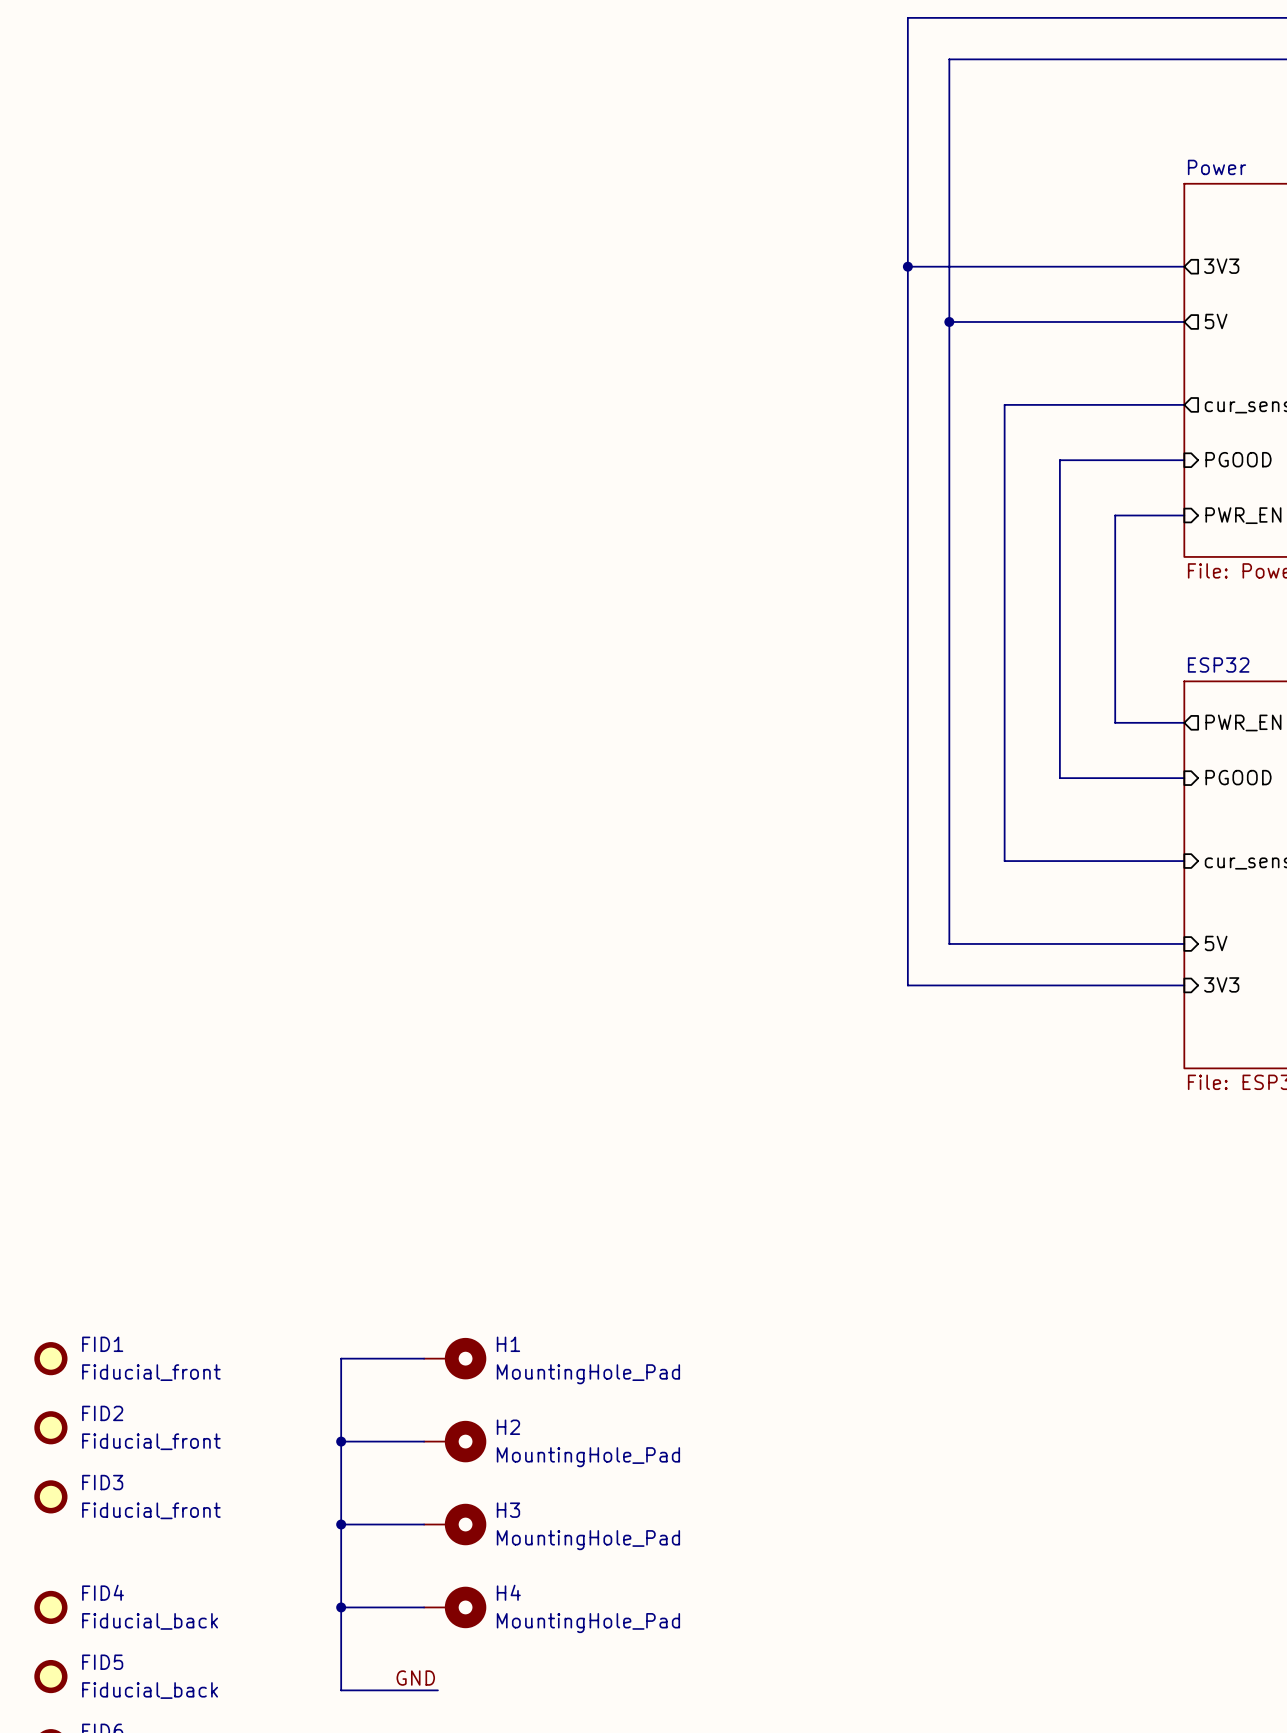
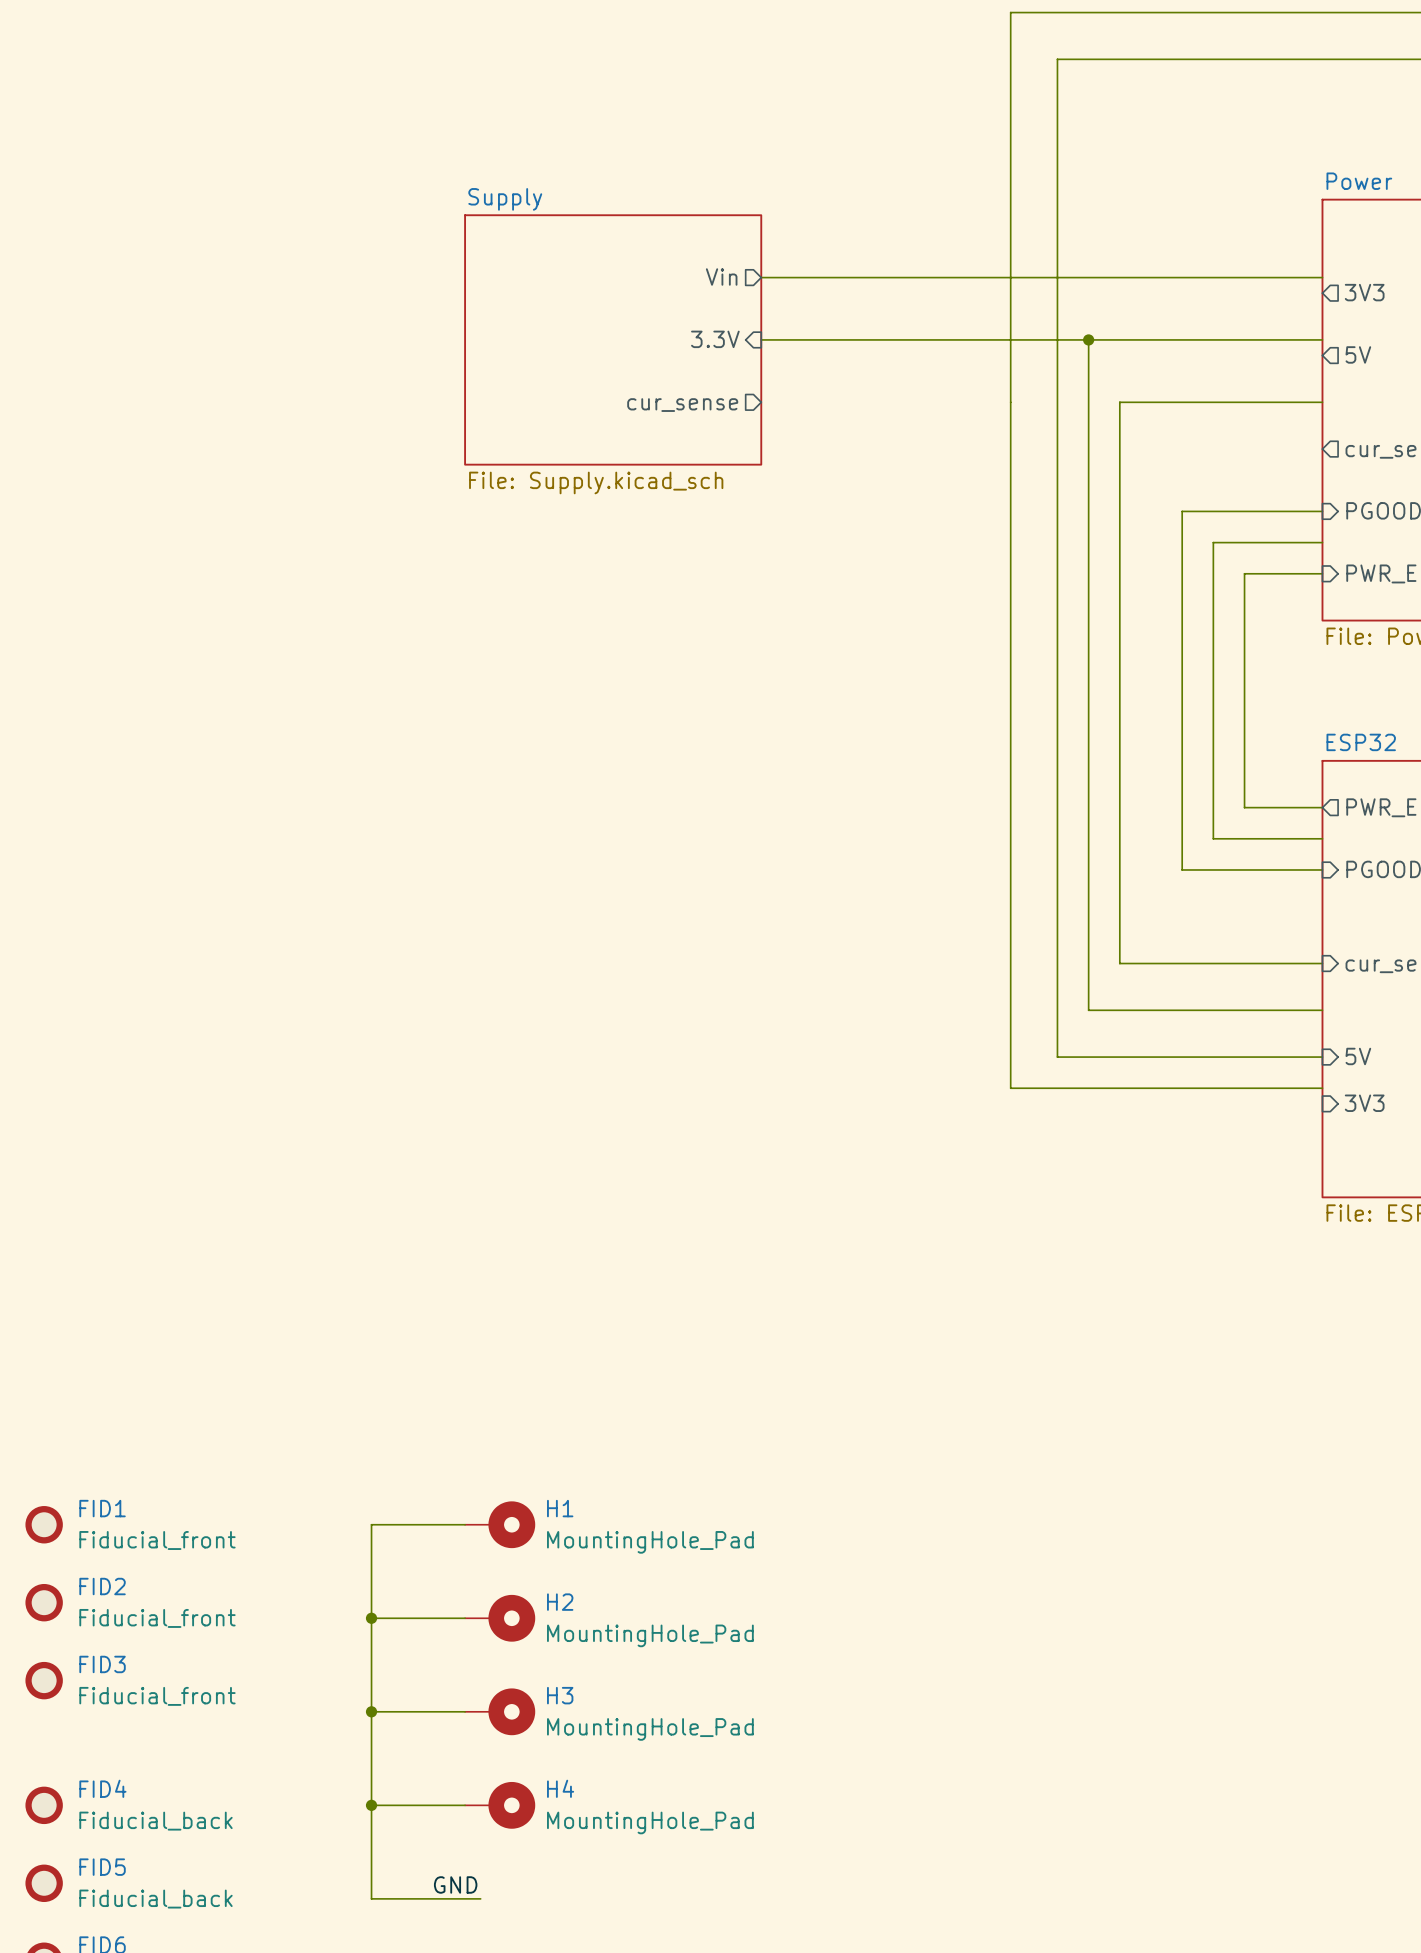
sheet pin: none -> Vin (721, 277)
wire: none -> (761, 277) (1322, 277)
wire: (907, 266) (1184, 266) -> none
junction: (907, 266) -> none
sheet pin: none -> 3.3V (715, 339)
sheet Supply: none -> File: Supply.kicad_sch (613, 339)
wire: none -> (761, 339) (1322, 339)
wire: none -> (1088, 339) (1088, 1010) (1322, 1010)
wire: (949, 321) (1184, 321) -> none
junction position: (949, 321) -> (1088, 339)
sheet pin: none -> cur_sense (682, 405)
wire: (1004, 404) (1184, 404) -> (1119, 449) (1119, 402) (1322, 402)
wire: none -> (1322, 542) (1213, 542) (1213, 838) (1322, 838)
wire: (907, 971) (907, 985) (1184, 985) -> (1010, 1088) (1322, 1088)

